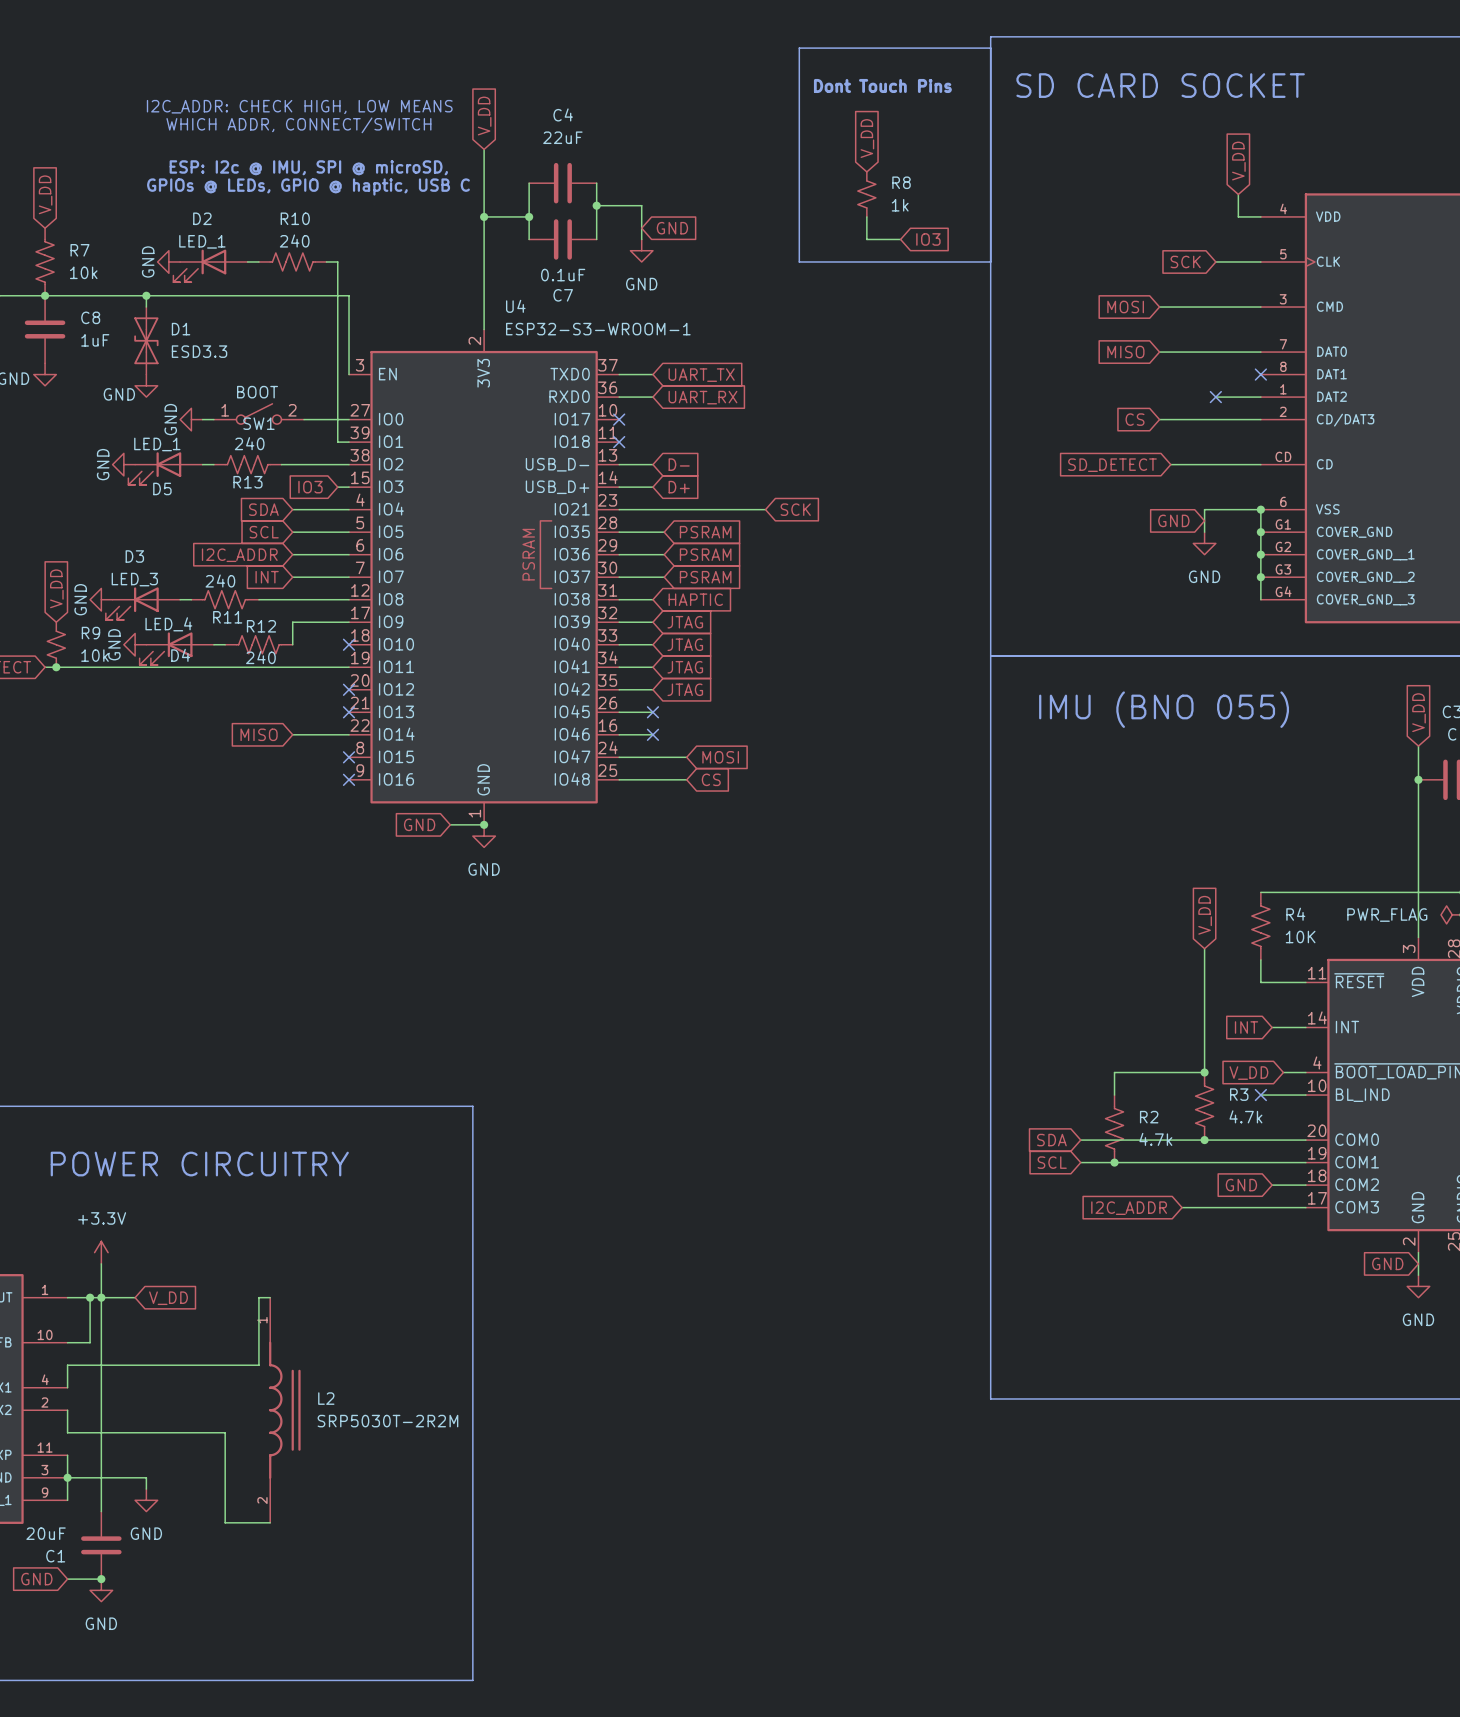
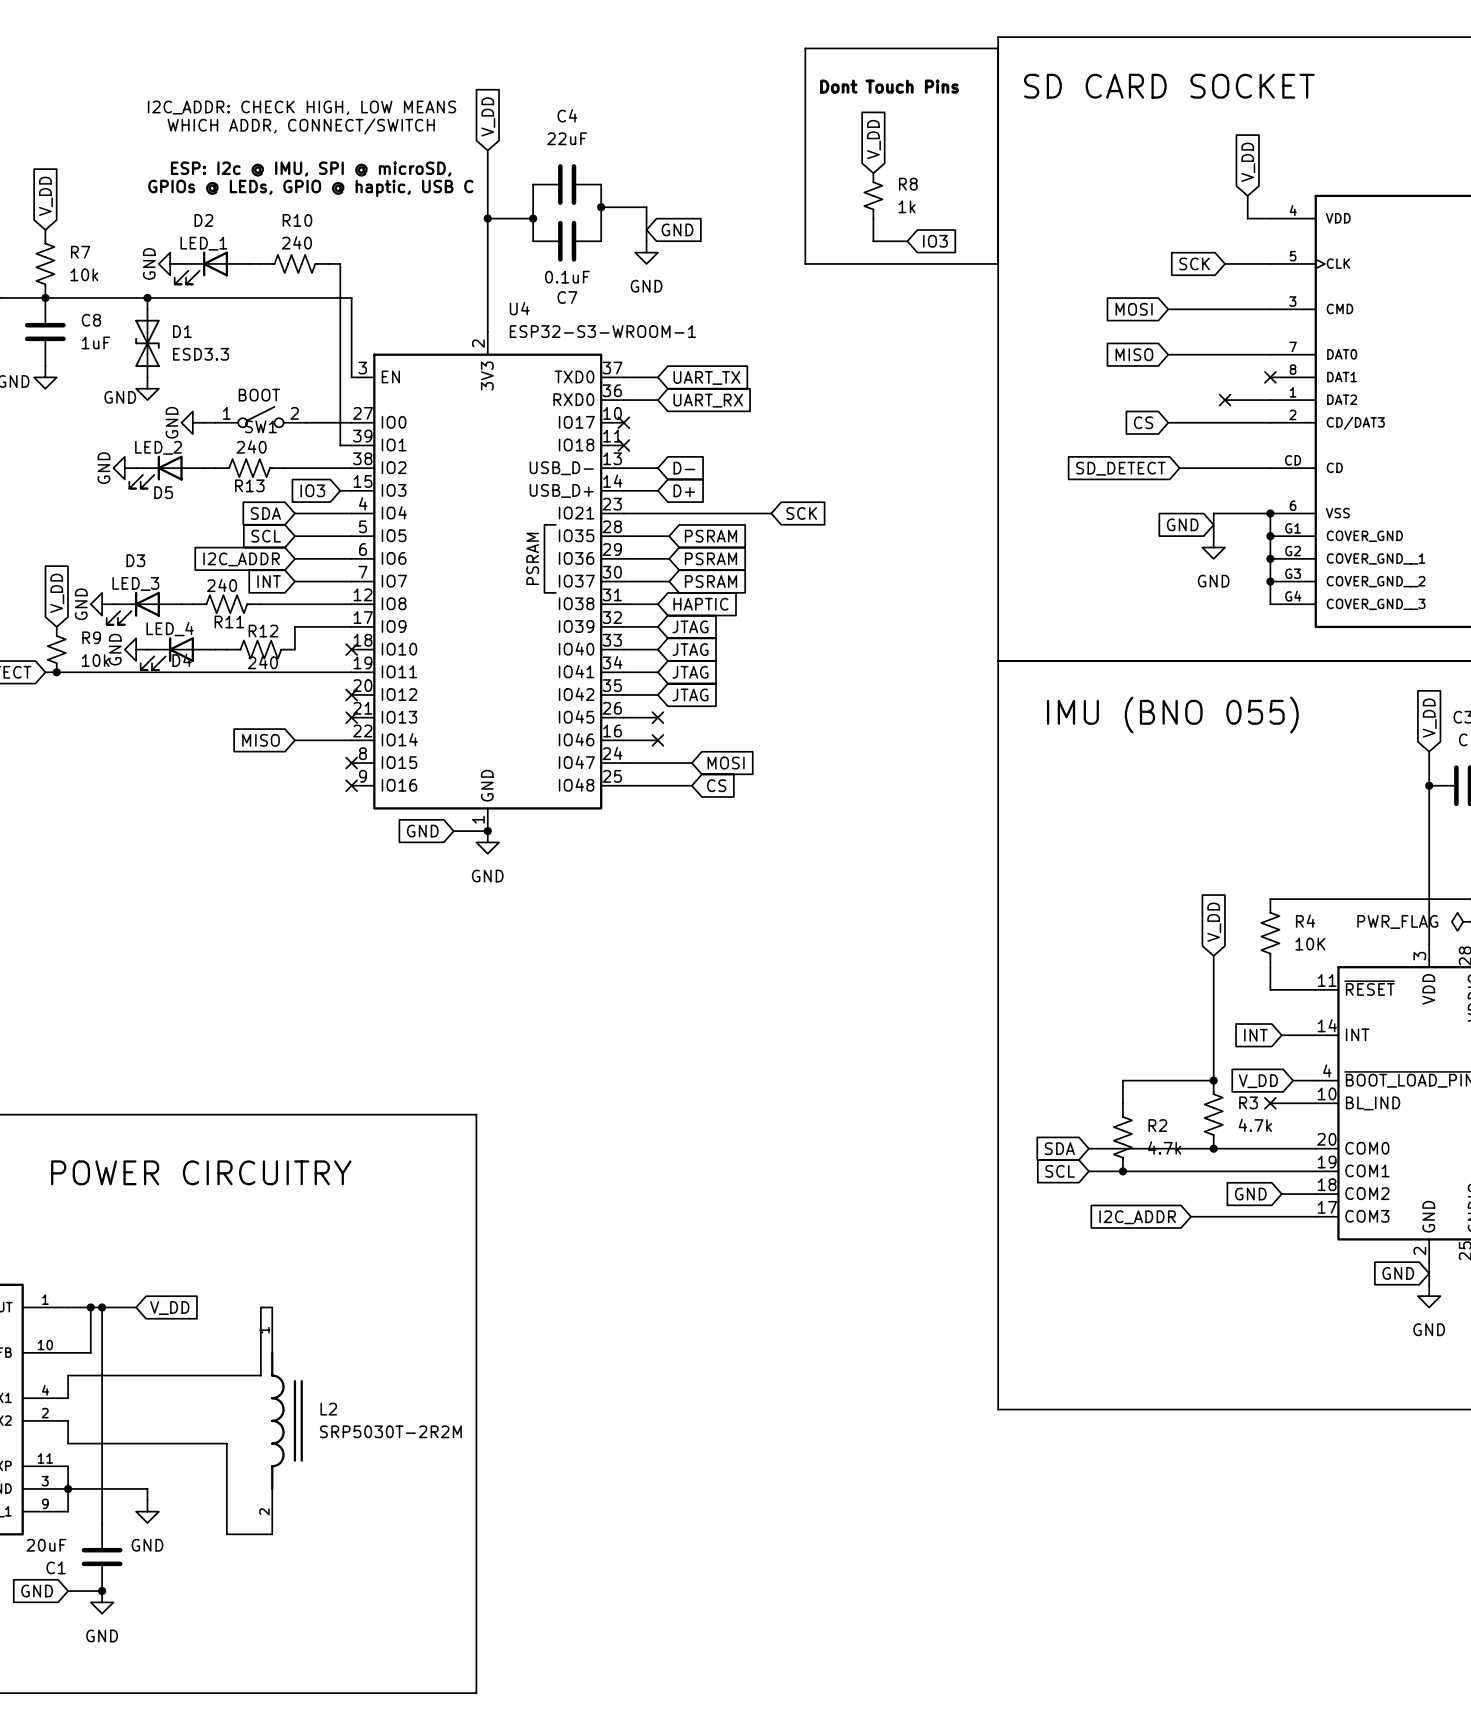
D5 value: LED_1 (157, 444) -> LED_2 (158, 447)
power symbol: +3.3V (101, 1252) -> none
wire: (101, 1263) (101, 1297) -> none

